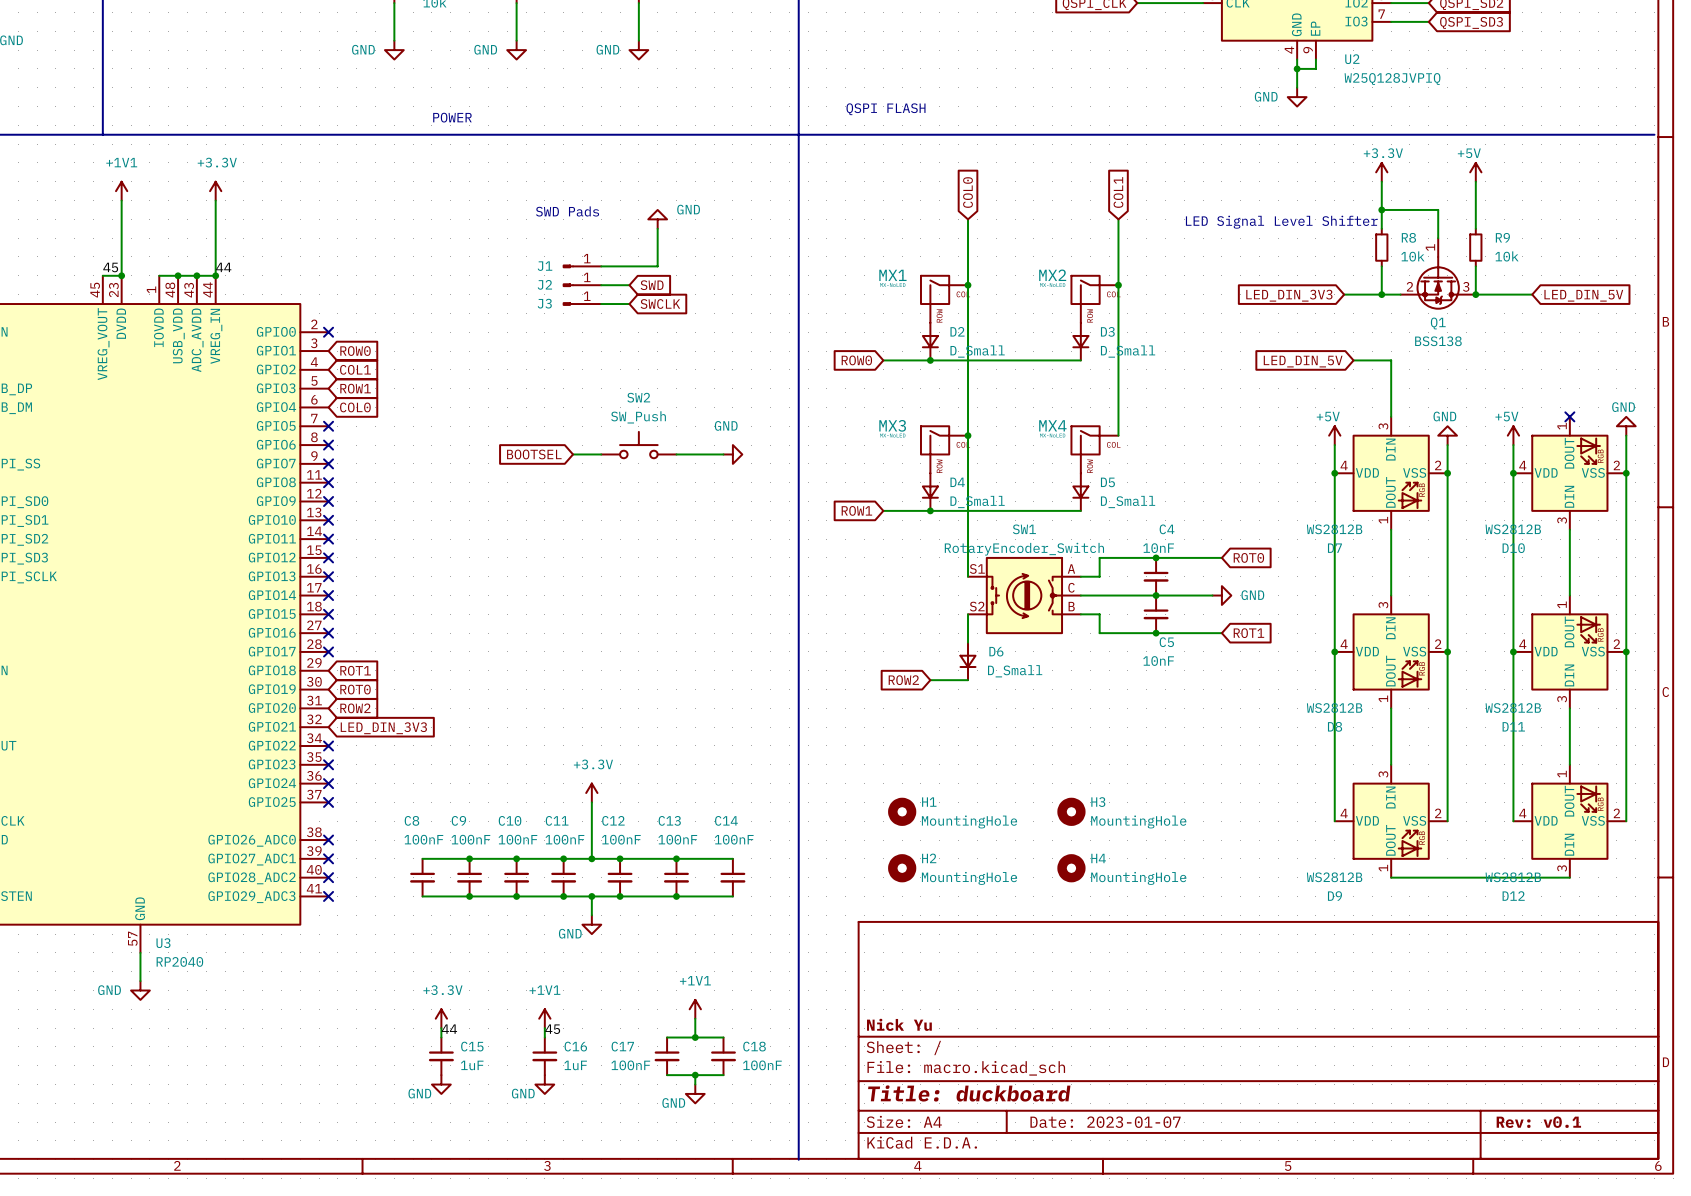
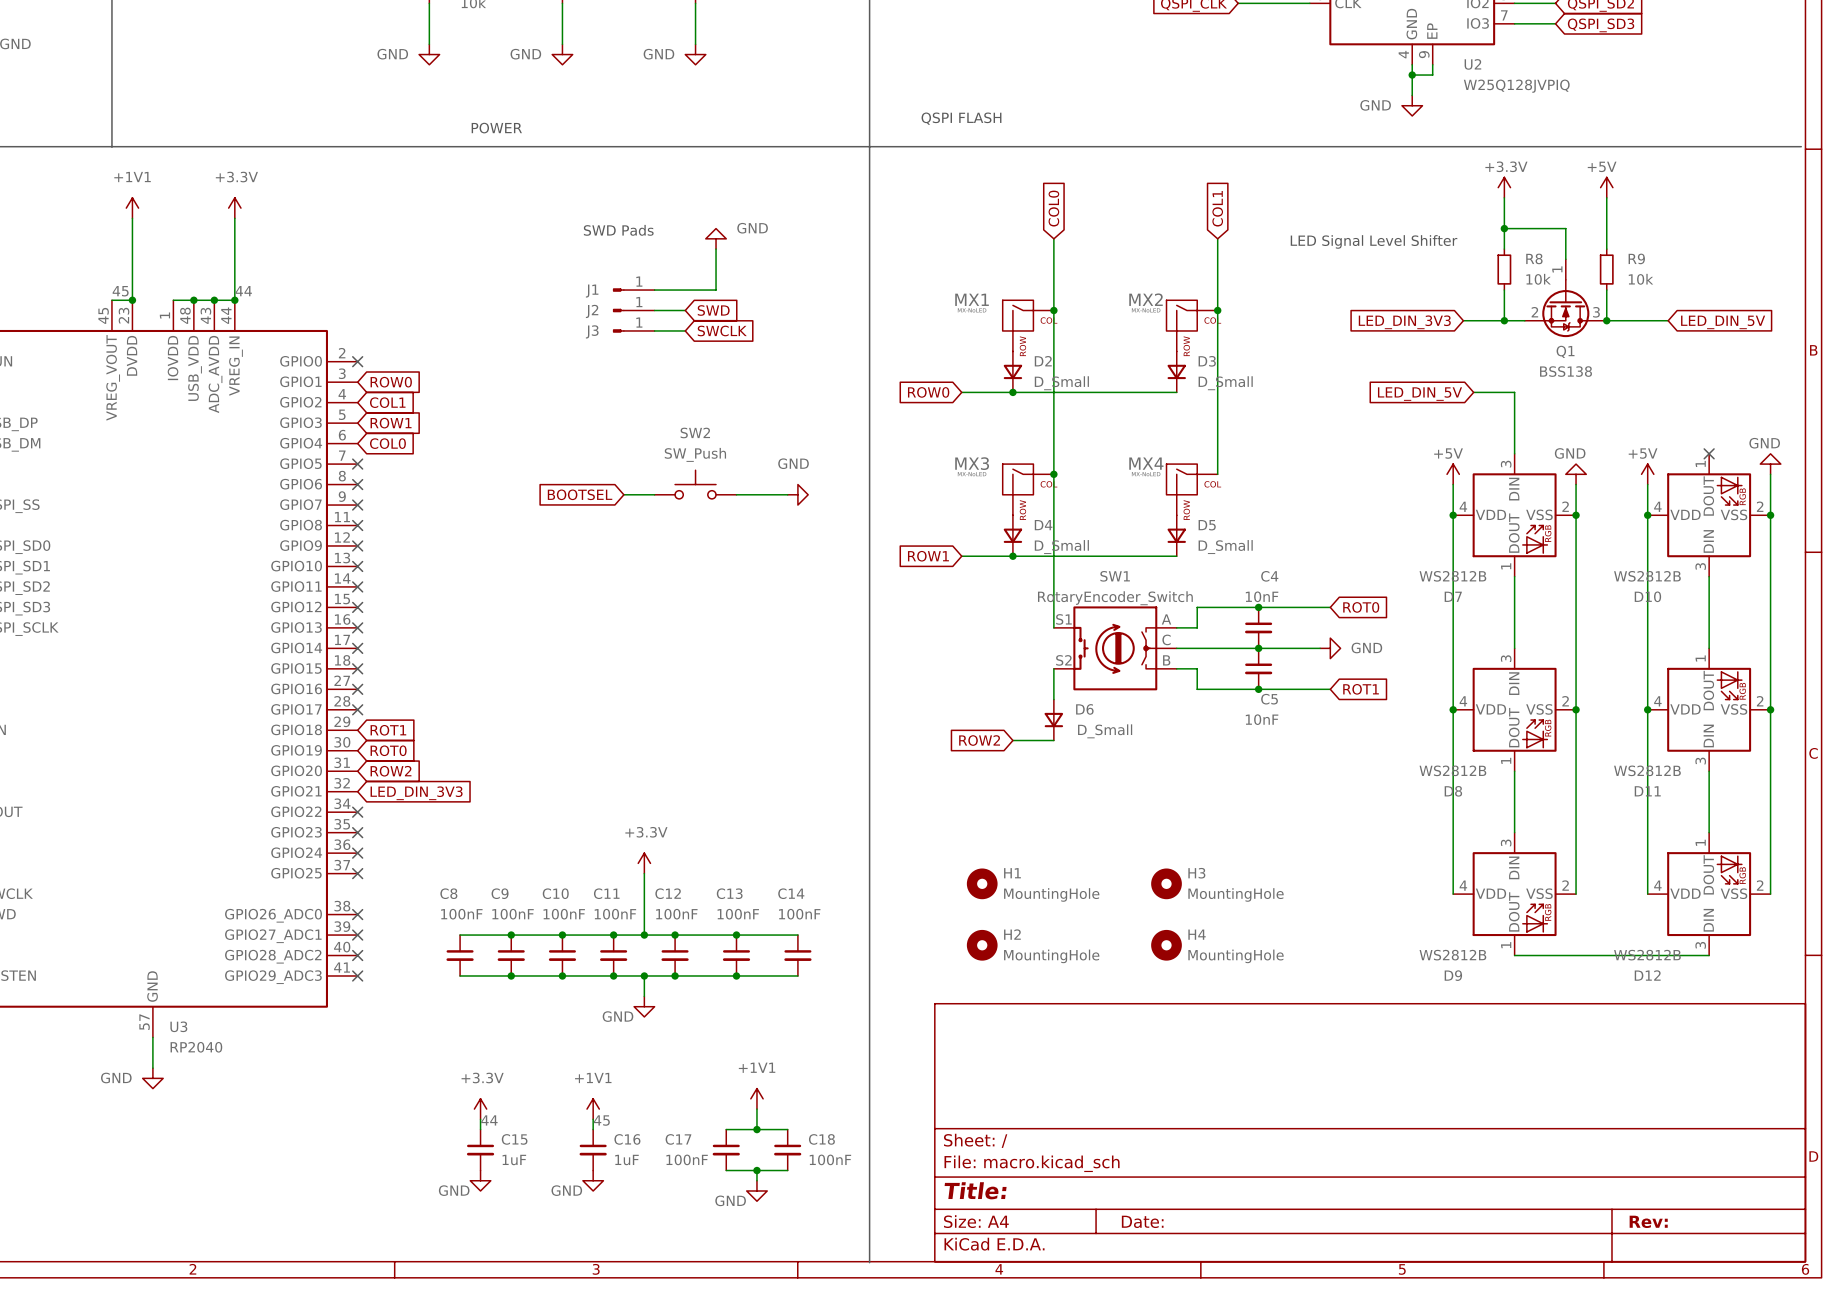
title block: Nick Yu (899, 1024) -> none
title block: Title: duckboard (969, 1093) -> Title: (975, 1190)
title block: Date: 2023-01-07 (1105, 1122) -> Date: (1142, 1221)
title block: Rev: v0.1 (1538, 1122) -> Rev: (1648, 1221)

